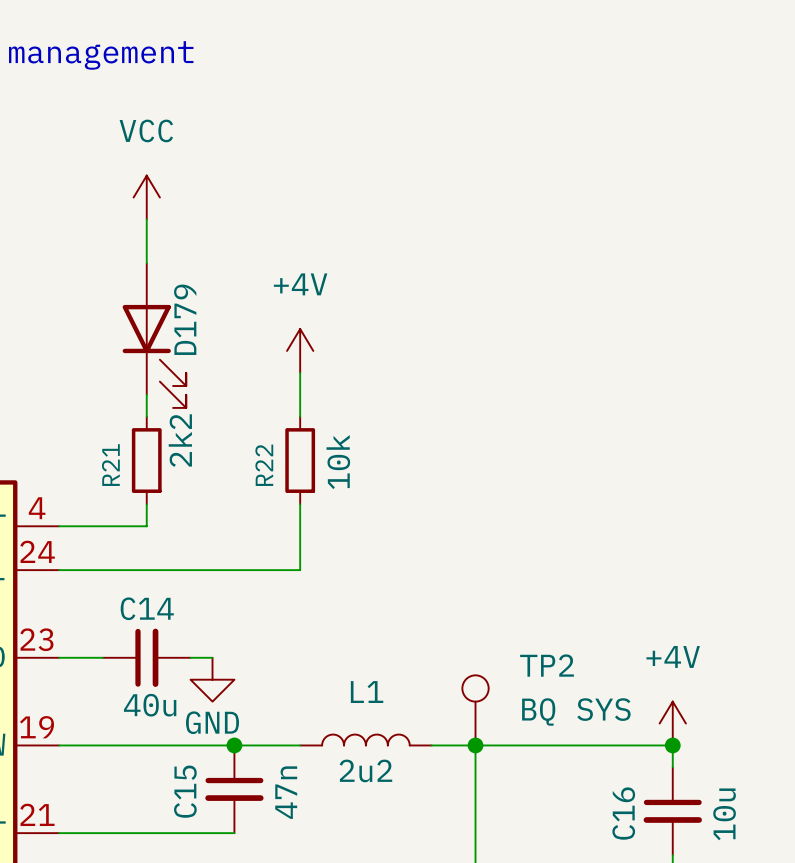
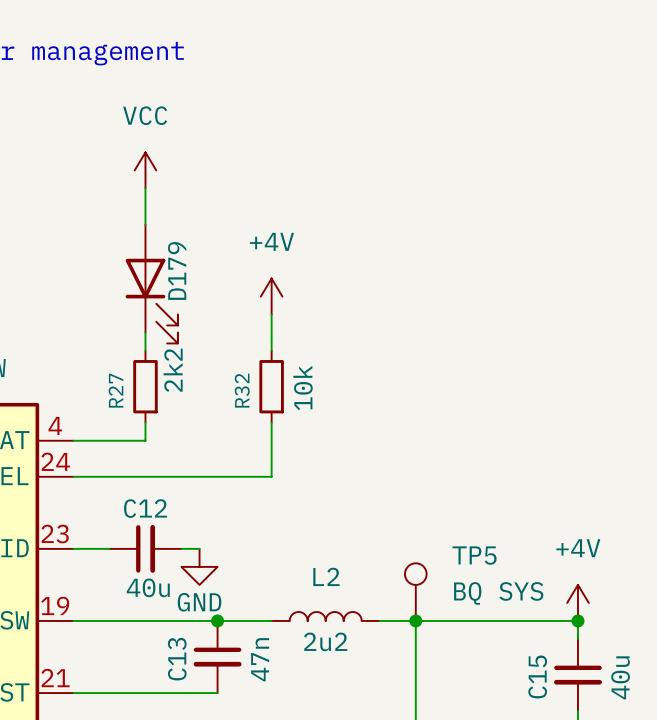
R21 name: R21 (110, 465) -> R27 (115, 390)
R22 name: R22 (264, 465) -> R32 (242, 390)
C14 name: C14 (147, 608) -> C12 (145, 508)
TP2 name: TP2 (547, 665) -> TP5 (474, 555)
L1 name: L1 (367, 692) -> L2 (326, 576)
C15 name: C15 (185, 791) -> C13 (177, 659)
C16 name: C16 (623, 813) -> C15 (537, 676)
C16 value: 10u (724, 814) -> 40u (620, 677)

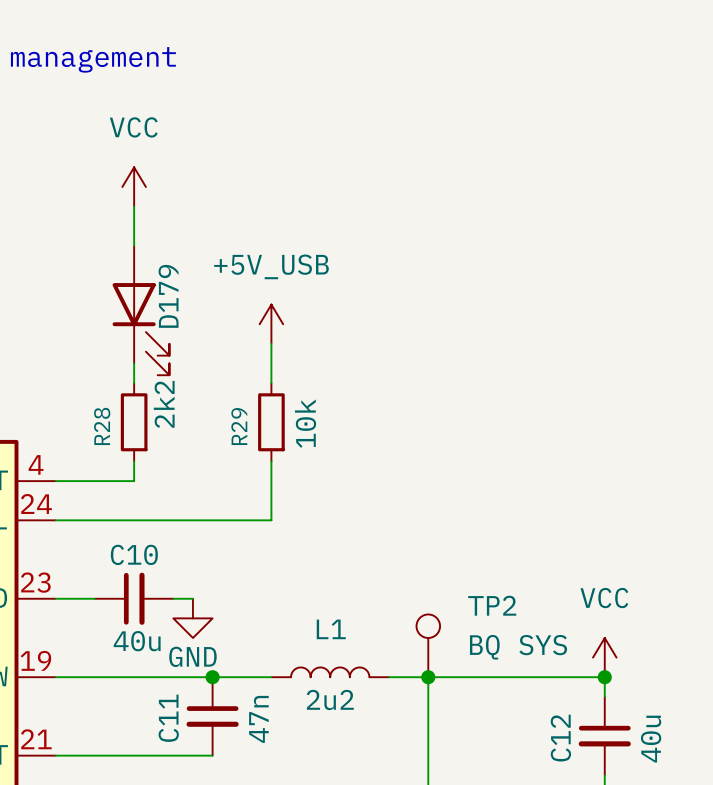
power symbol: +4V (271, 296) -> +5V_USB (271, 324)
R27 name: R27 (115, 390) -> R28 (102, 426)
R32 name: R32 (242, 390) -> R29 (239, 426)
C12 name: C12 (145, 508) -> C10 (134, 554)
TP5 name: TP5 (474, 555) -> TP2 (492, 605)
L2 name: L2 (326, 576) -> L1 (331, 629)
power symbol: +4V (577, 602) -> VCC (604, 657)
C13 name: C13 (177, 659) -> C11 (168, 718)
C15 name: C15 (537, 676) -> C12 (560, 738)

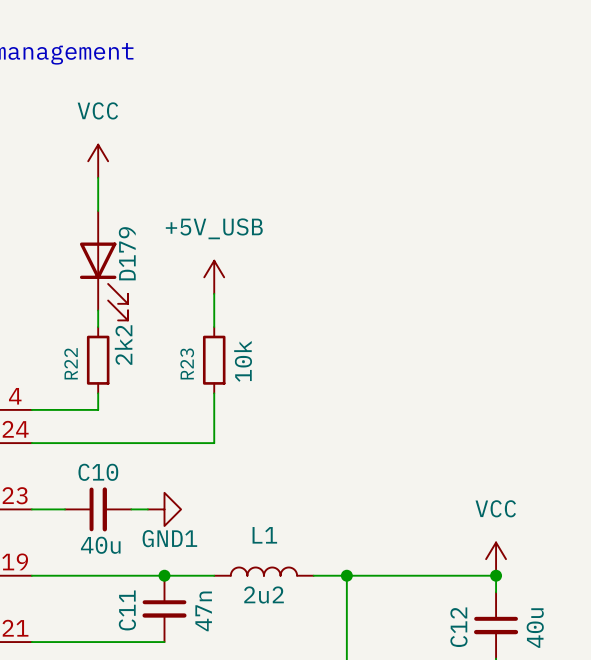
R28 name: R28 (102, 426) -> R22 (71, 363)
R29 name: R29 (239, 426) -> R23 (187, 363)
power symbol: none -> GND1 (164, 509)
power symbol: GND (192, 618) -> none
TP2: BQ SYS (428, 645) -> none

